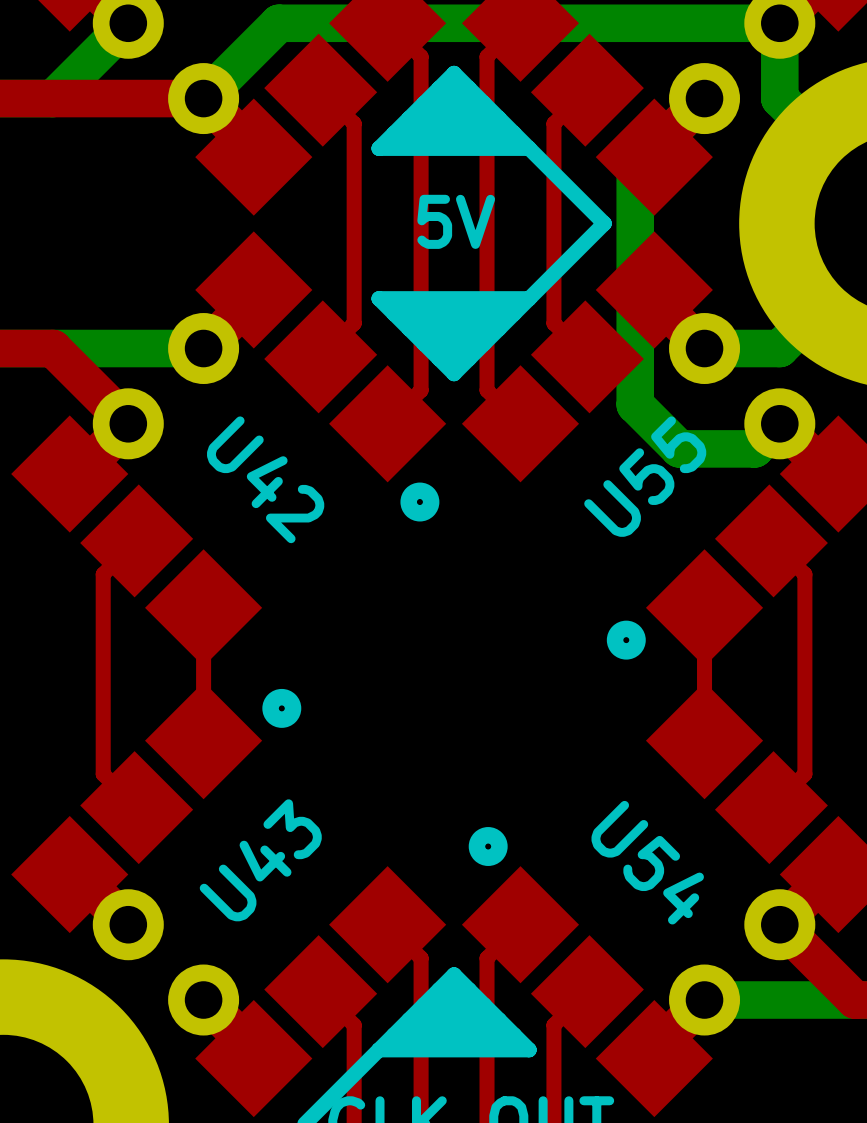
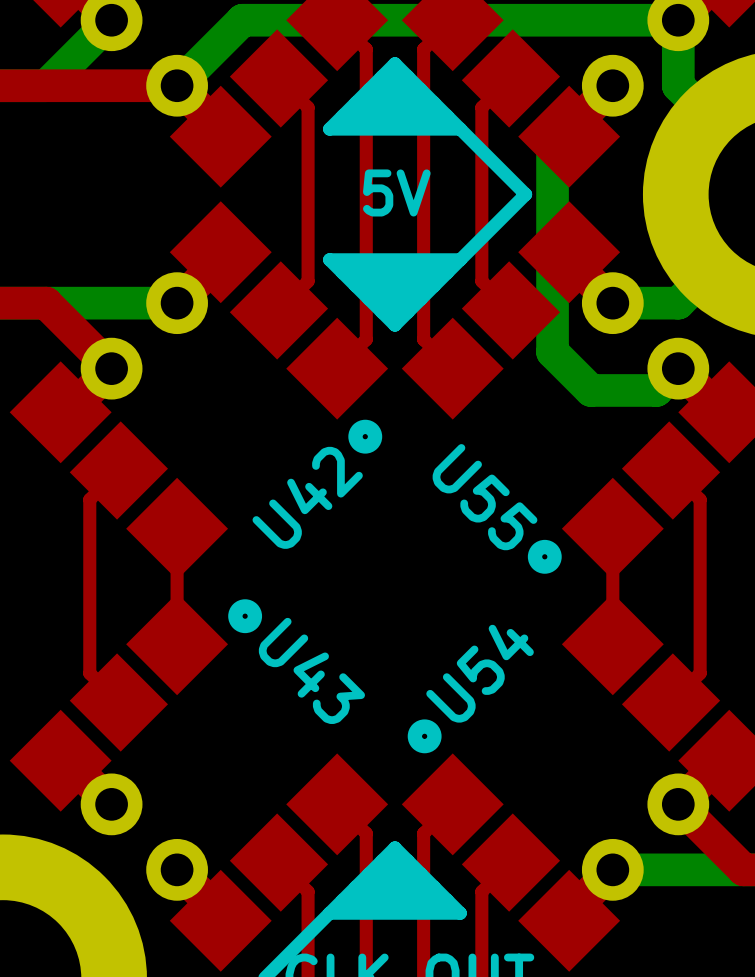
U55 name rotation: 0° (645, 476) -> 90° clockwise (485, 497)
U42 name rotation: 0° (265, 479) -> 90° counterclockwise (307, 497)
U43 name rotation: 0° (260, 860) -> 90° clockwise (311, 670)
U54 name rotation: 0° (647, 862) -> 90° counterclockwise (480, 673)

